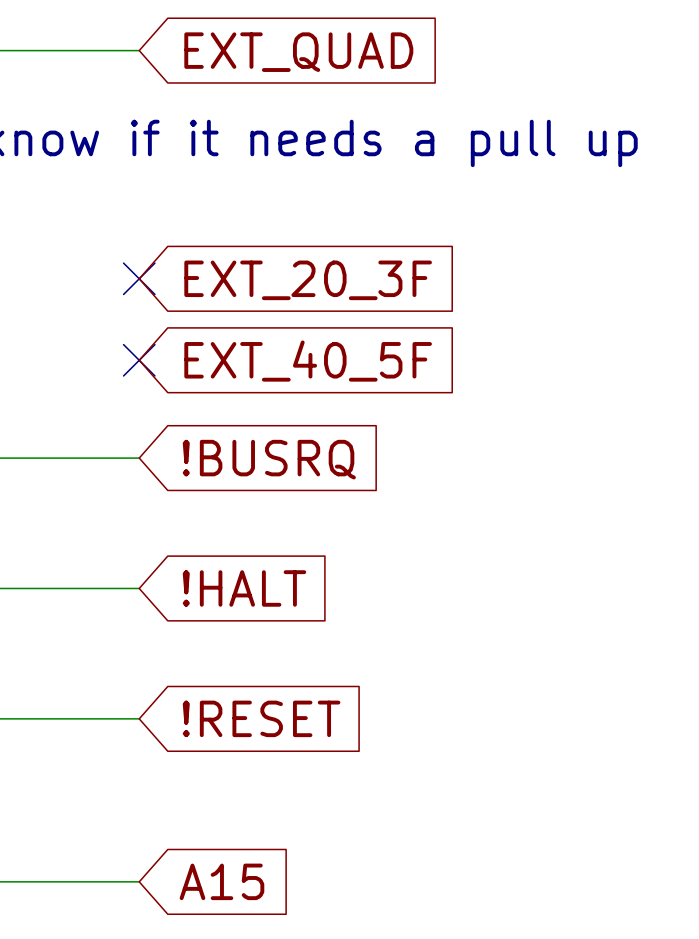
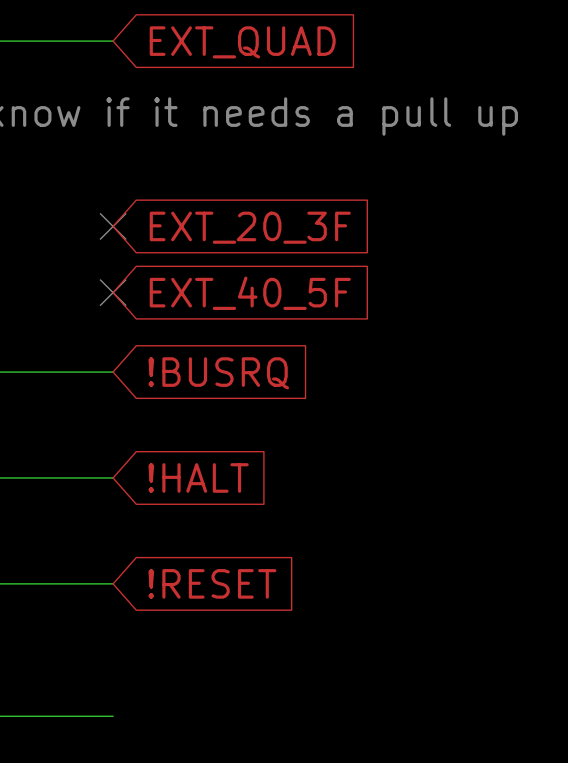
global label: A15 (221, 881) -> none

